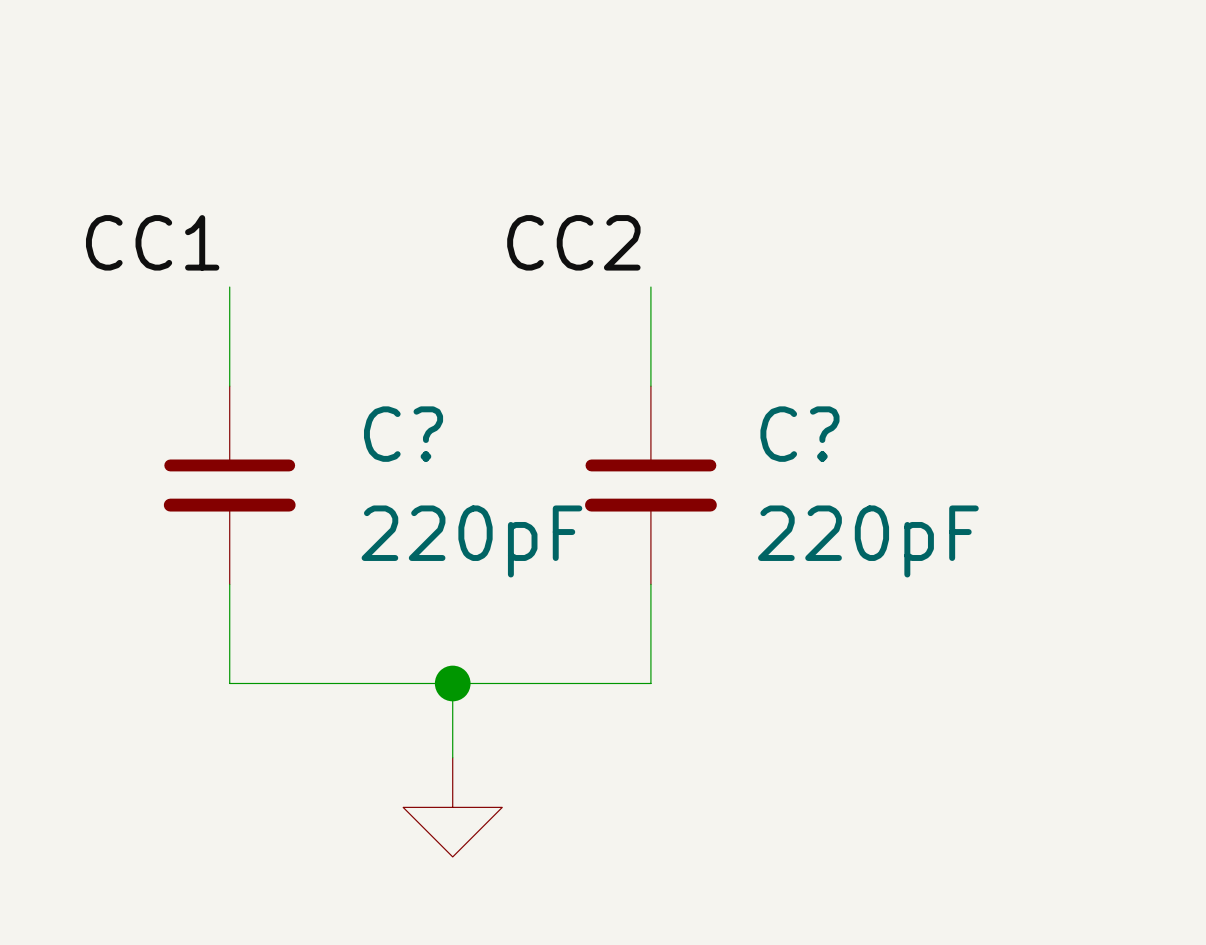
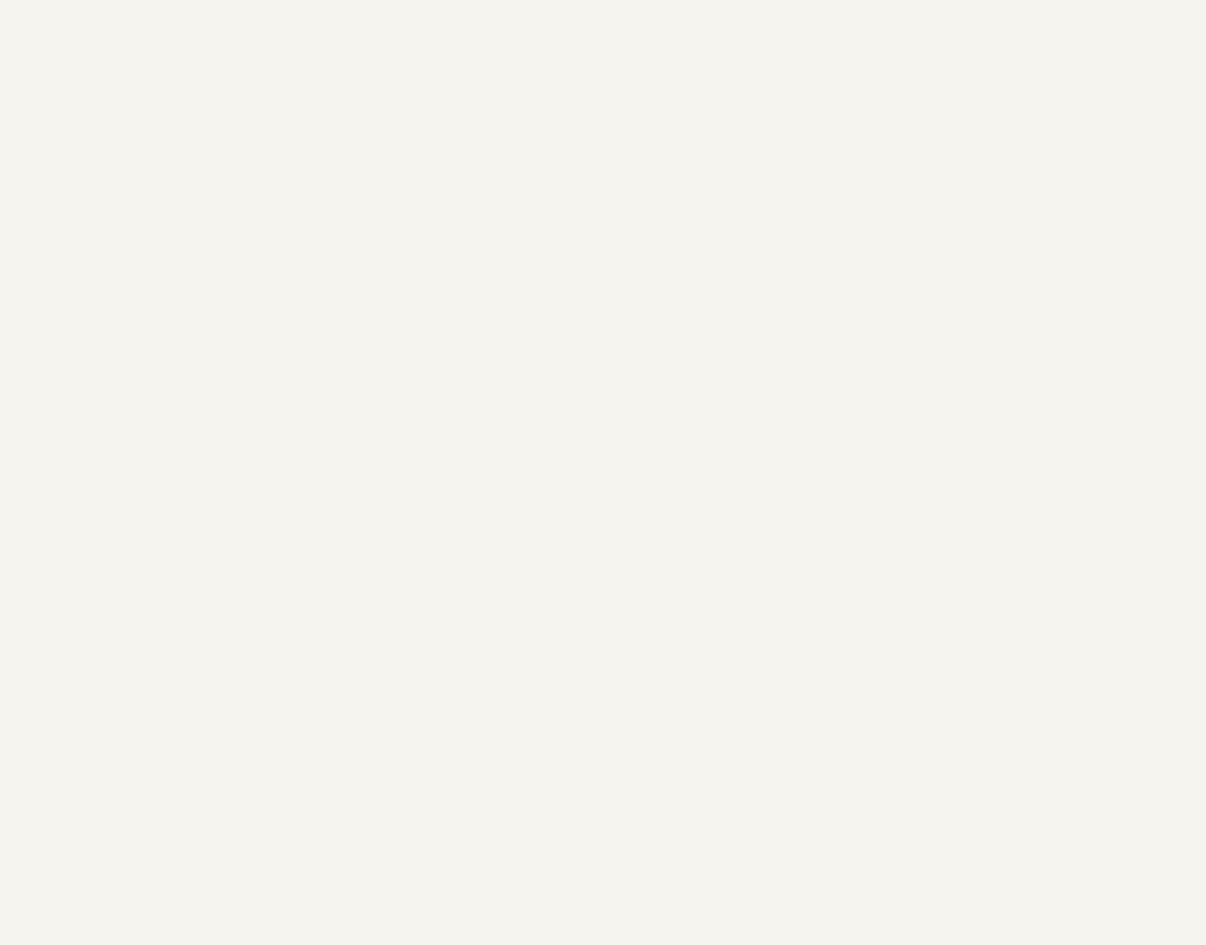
label: CC1 (152, 242) -> none
label: CC2 (573, 242) -> none
wire: (229, 287) (229, 386) -> none
wire: (650, 287) (650, 386) -> none
C?: 220pF (229, 485) -> none
C?: 220pF (650, 485) -> none
wire: (229, 584) (229, 683) (650, 683) (650, 584) -> none
wire: (452, 683) (452, 757) -> none
junction: (452, 683) -> none
power symbol: (452, 807) -> none

